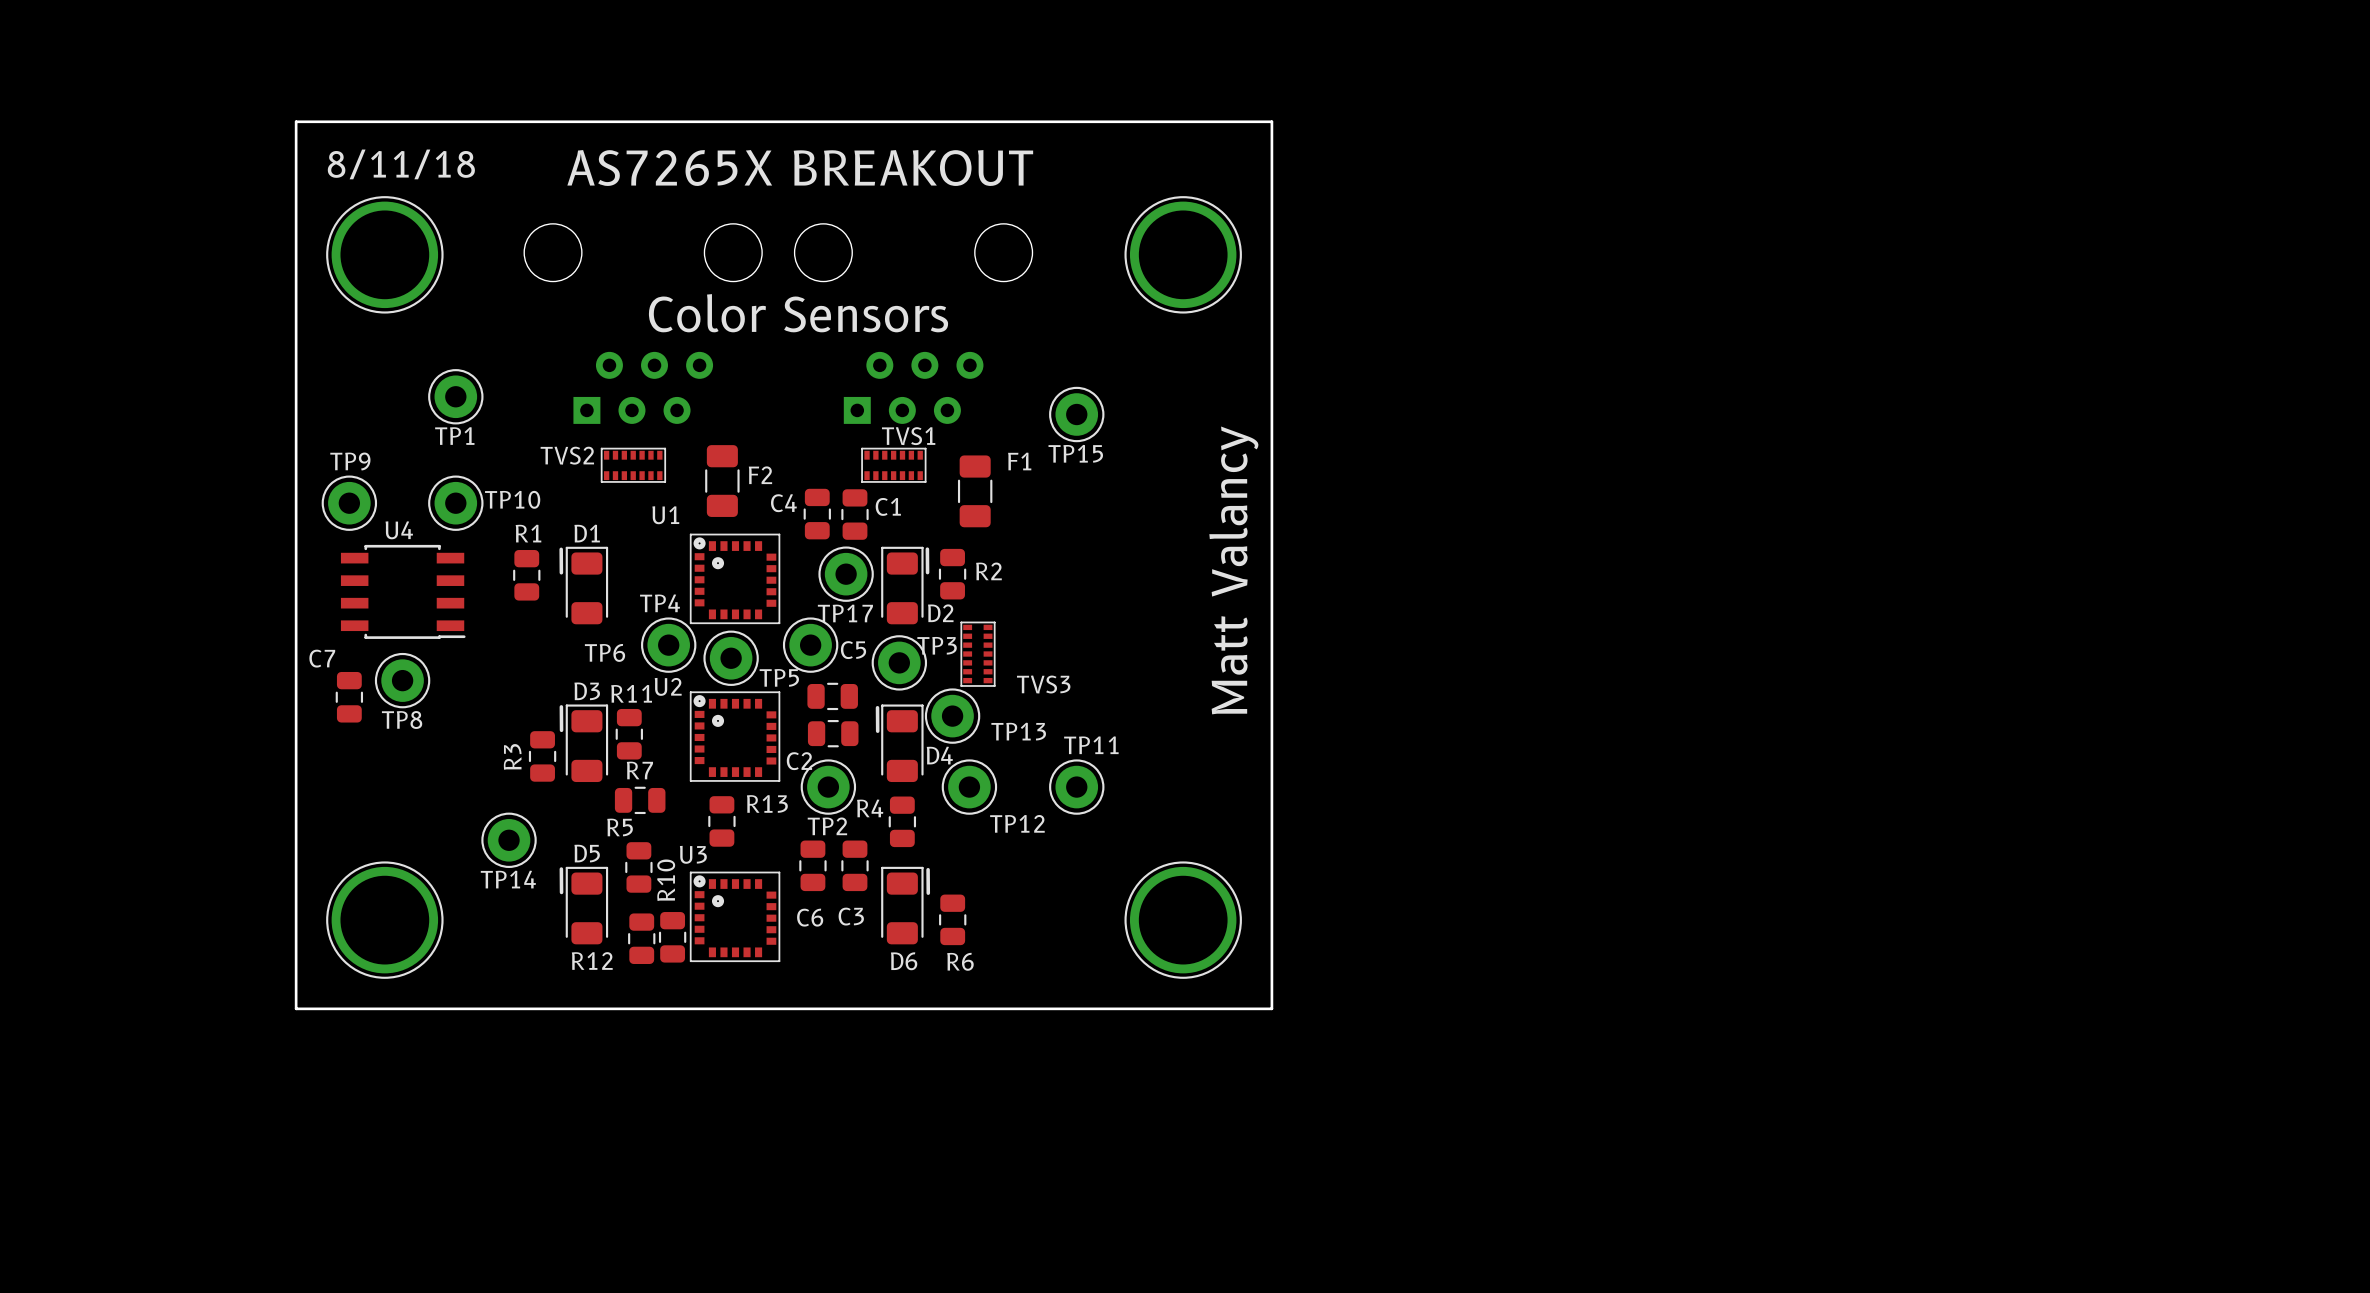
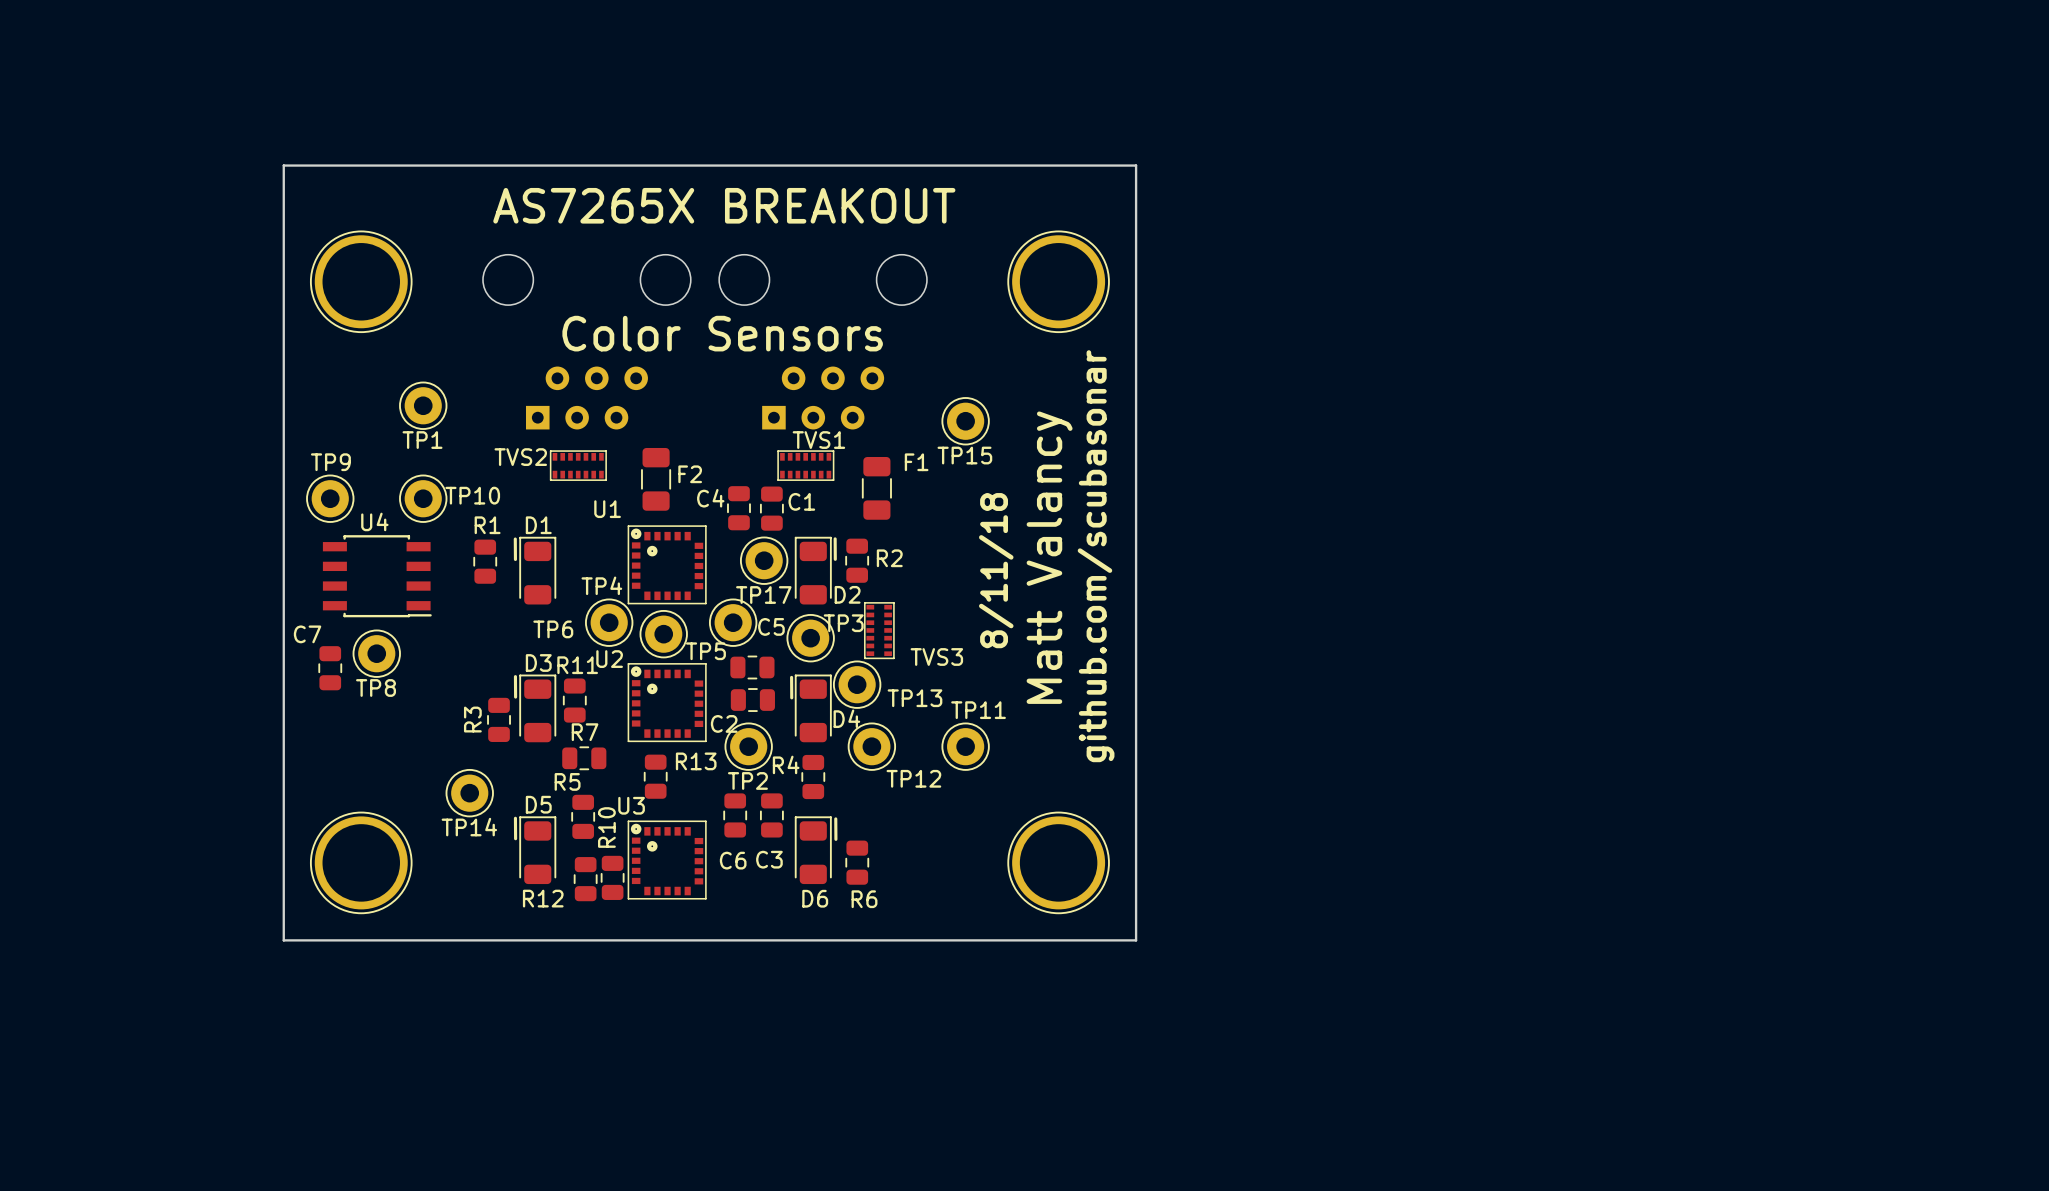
text: 8/11/18 (401, 164) -> none
text: none -> Matt Valancy (1049, 557)
text: Matt Valancy (1233, 570) -> github.com/scubasonar (1096, 556)
text: none -> 8/11/18 (996, 570)

